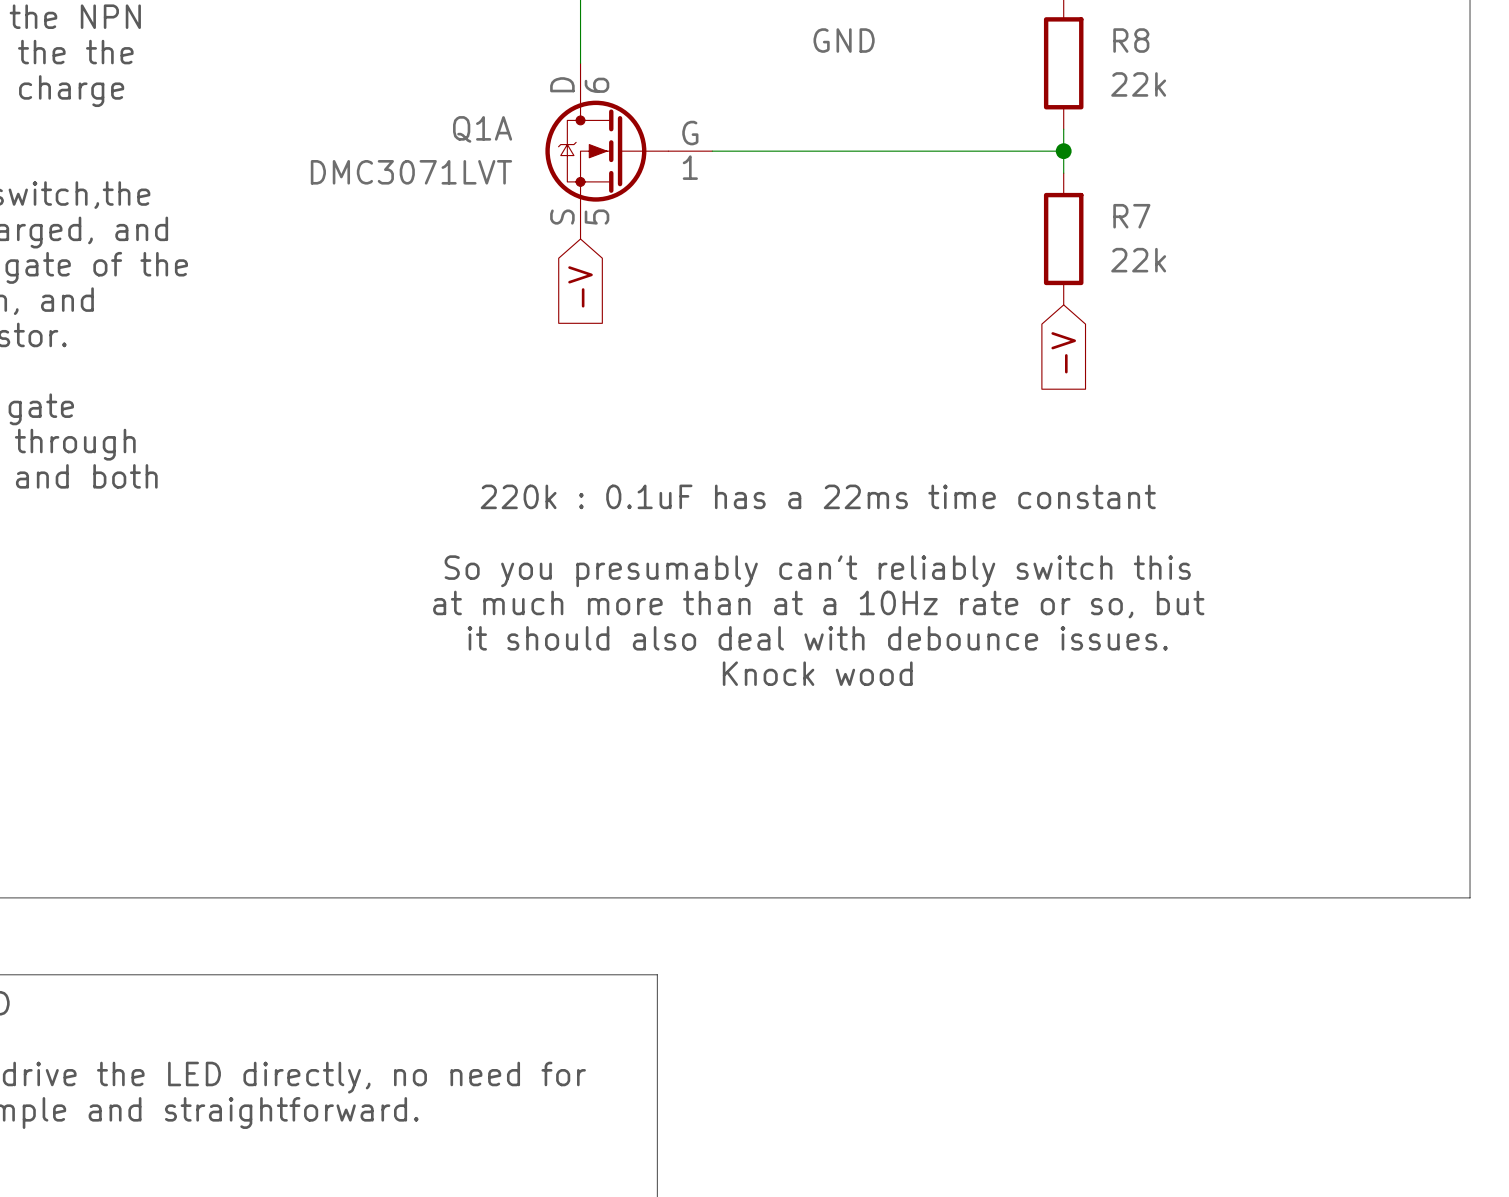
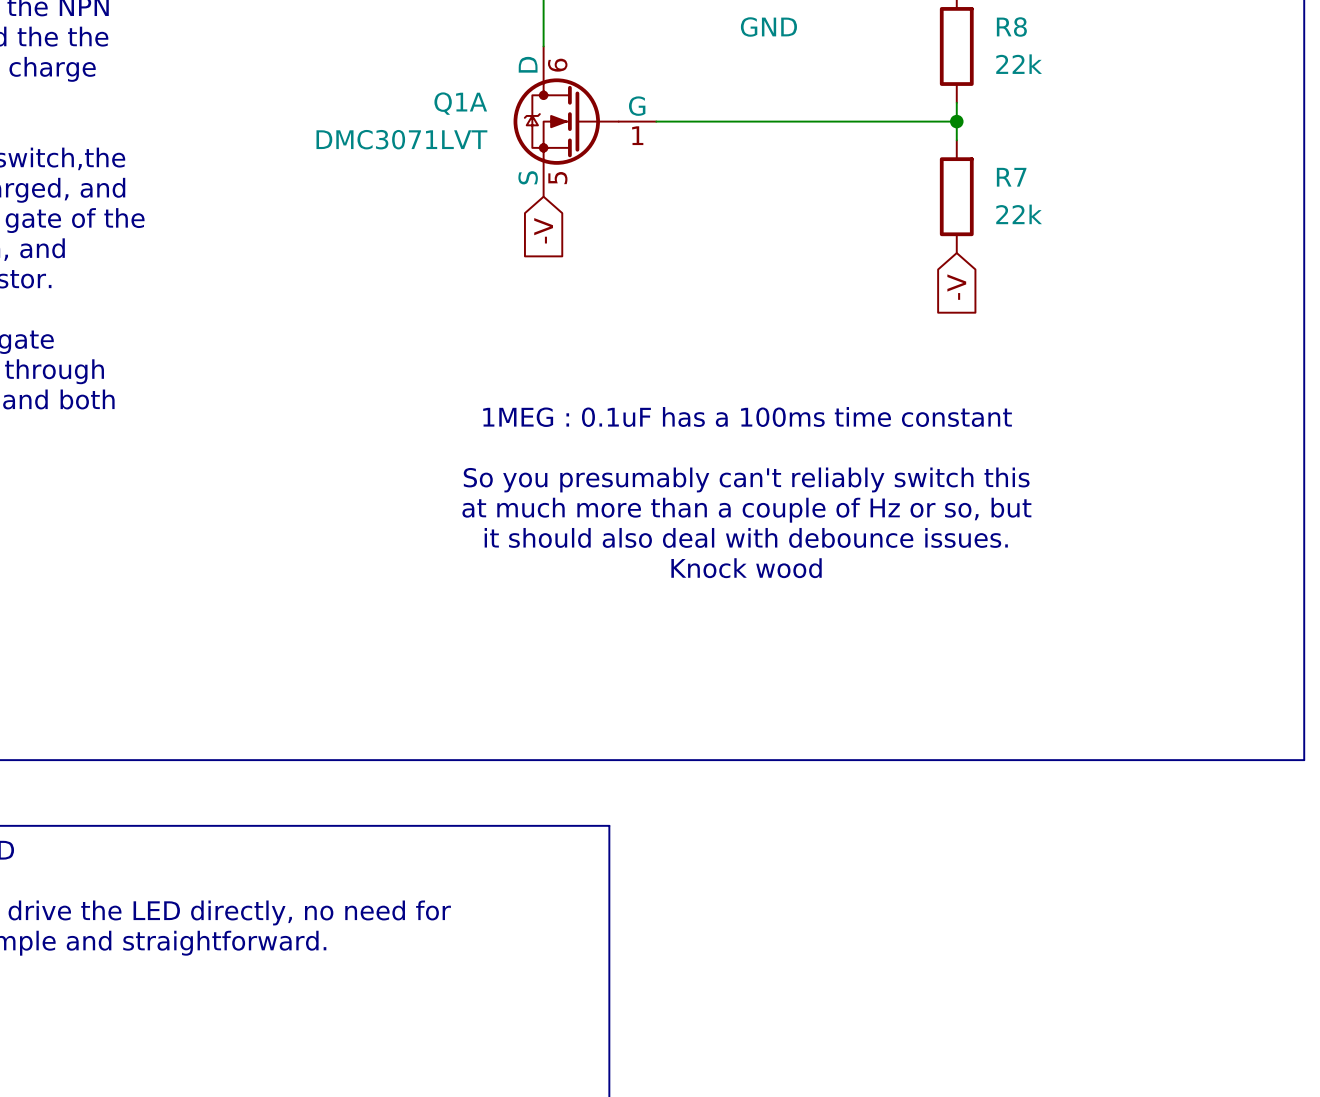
text: 220k : 0.1uF has a 22ms time constant (818, 496) -> 1MEG : 0.1uF has a 100ms time constant (747, 416)
text: at much more than at a 10Hz rate or so, but (818, 604) -> at much more than a couple of Hz or so, but (746, 510)

